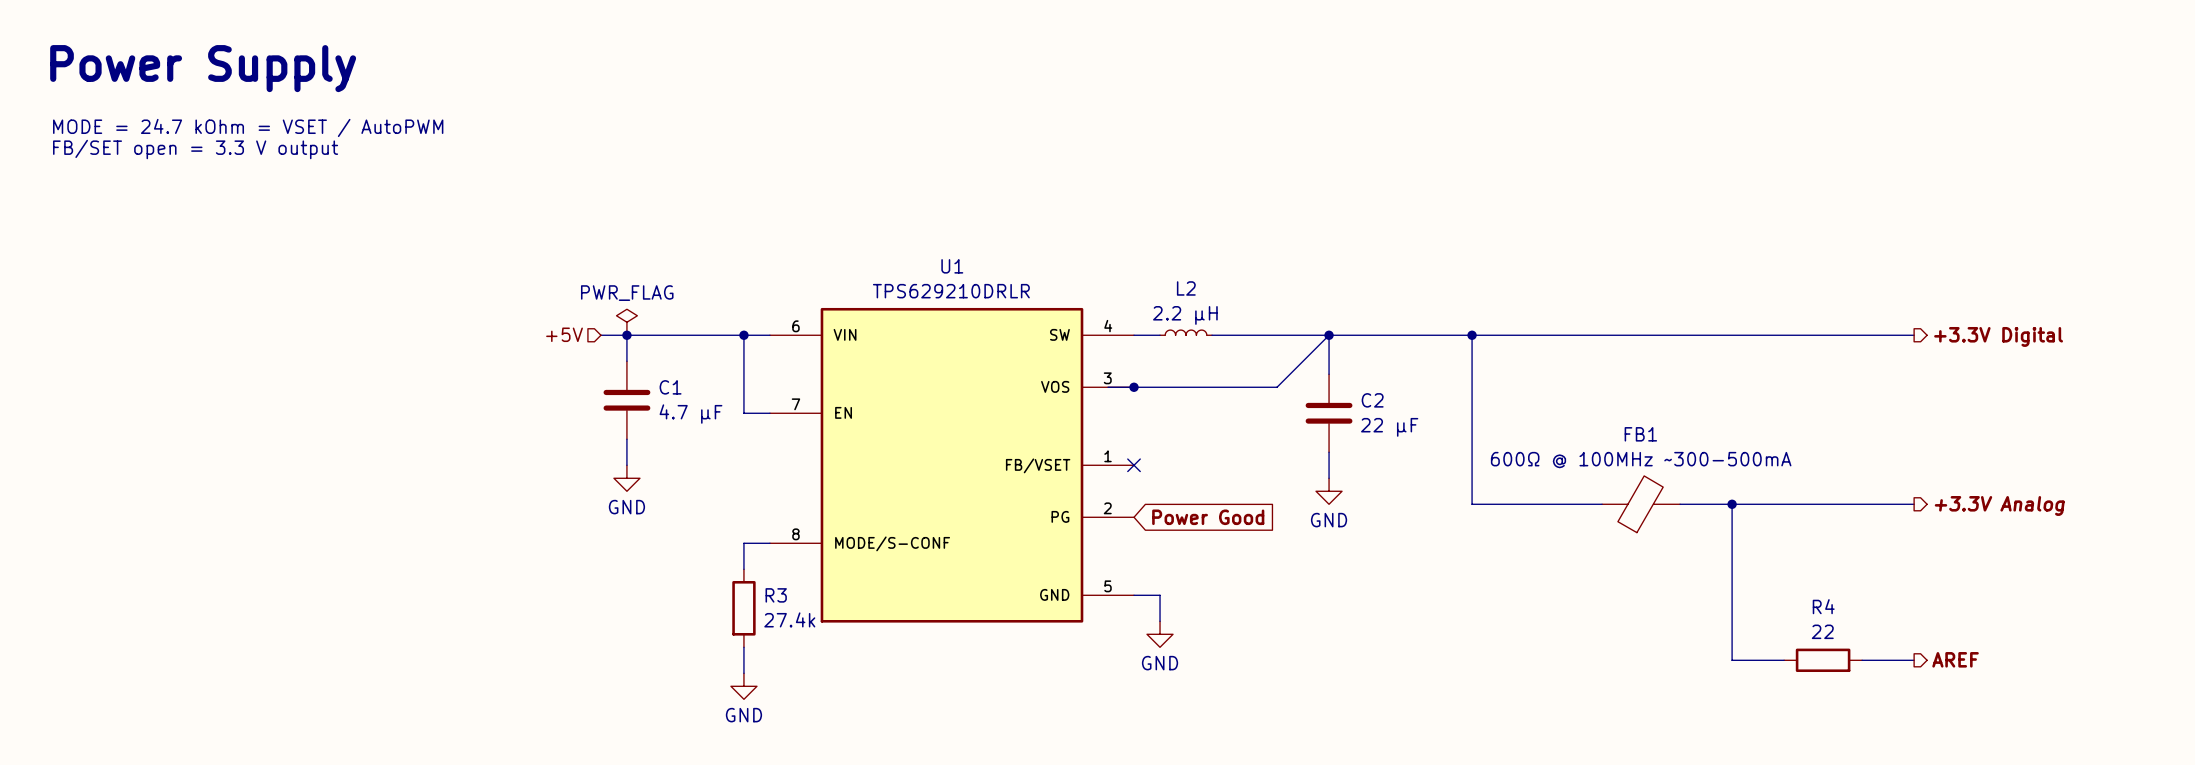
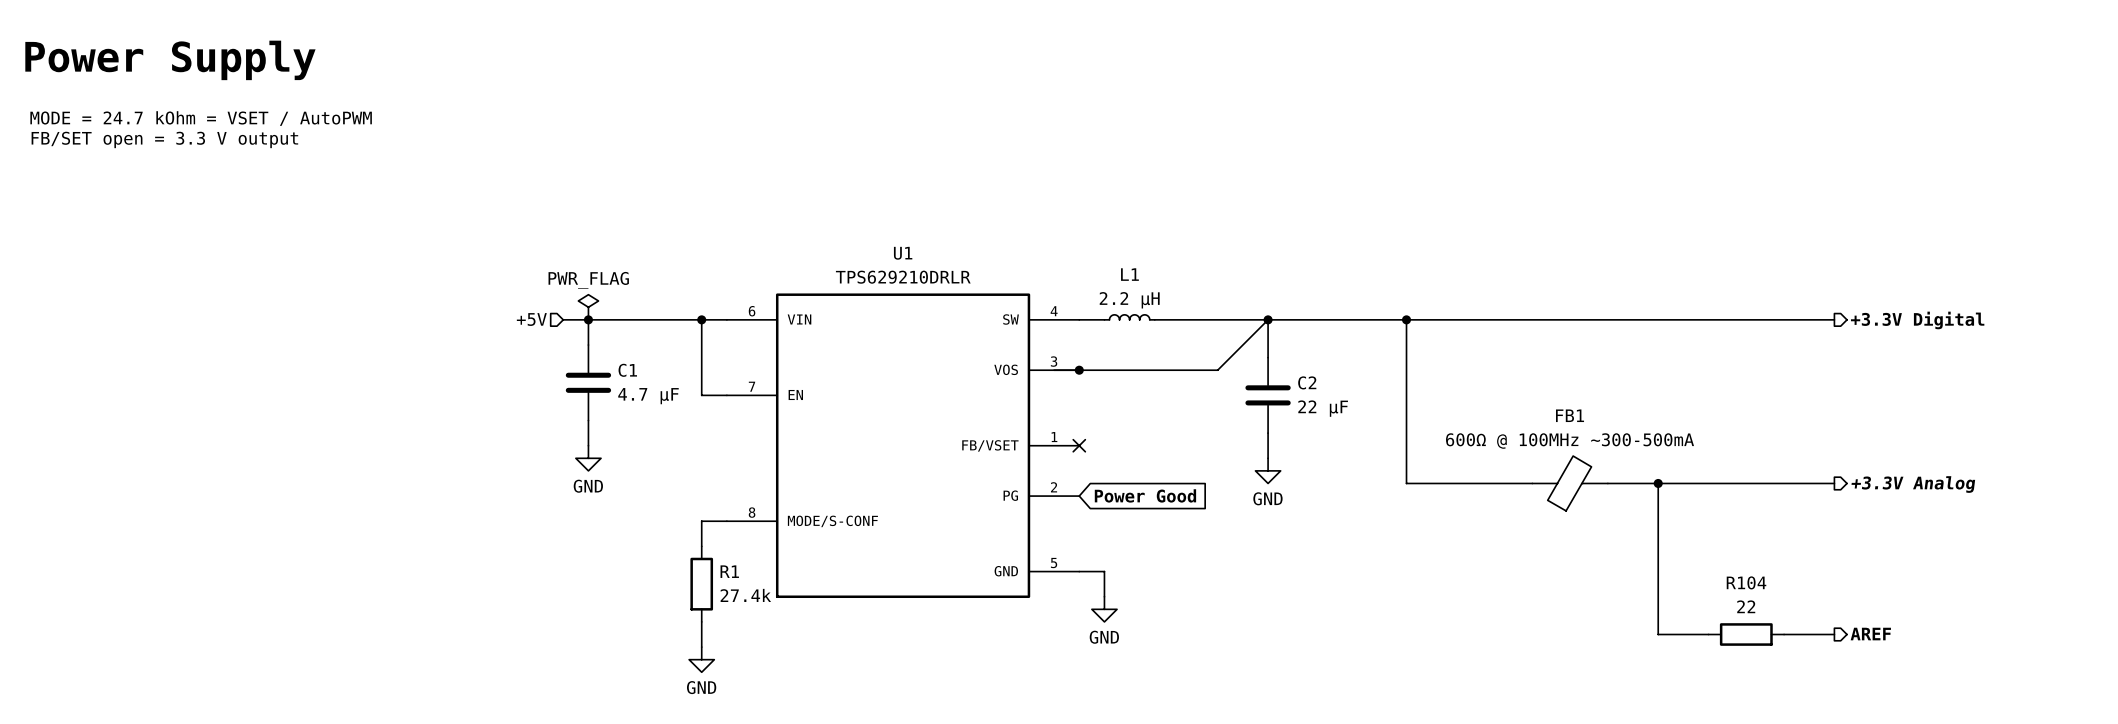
L2 name: L2 (1186, 288) -> L1 (1129, 274)
R3 name: R3 (776, 595) -> R1 (729, 571)
R4 name: R4 (1823, 606) -> R104 (1746, 582)

